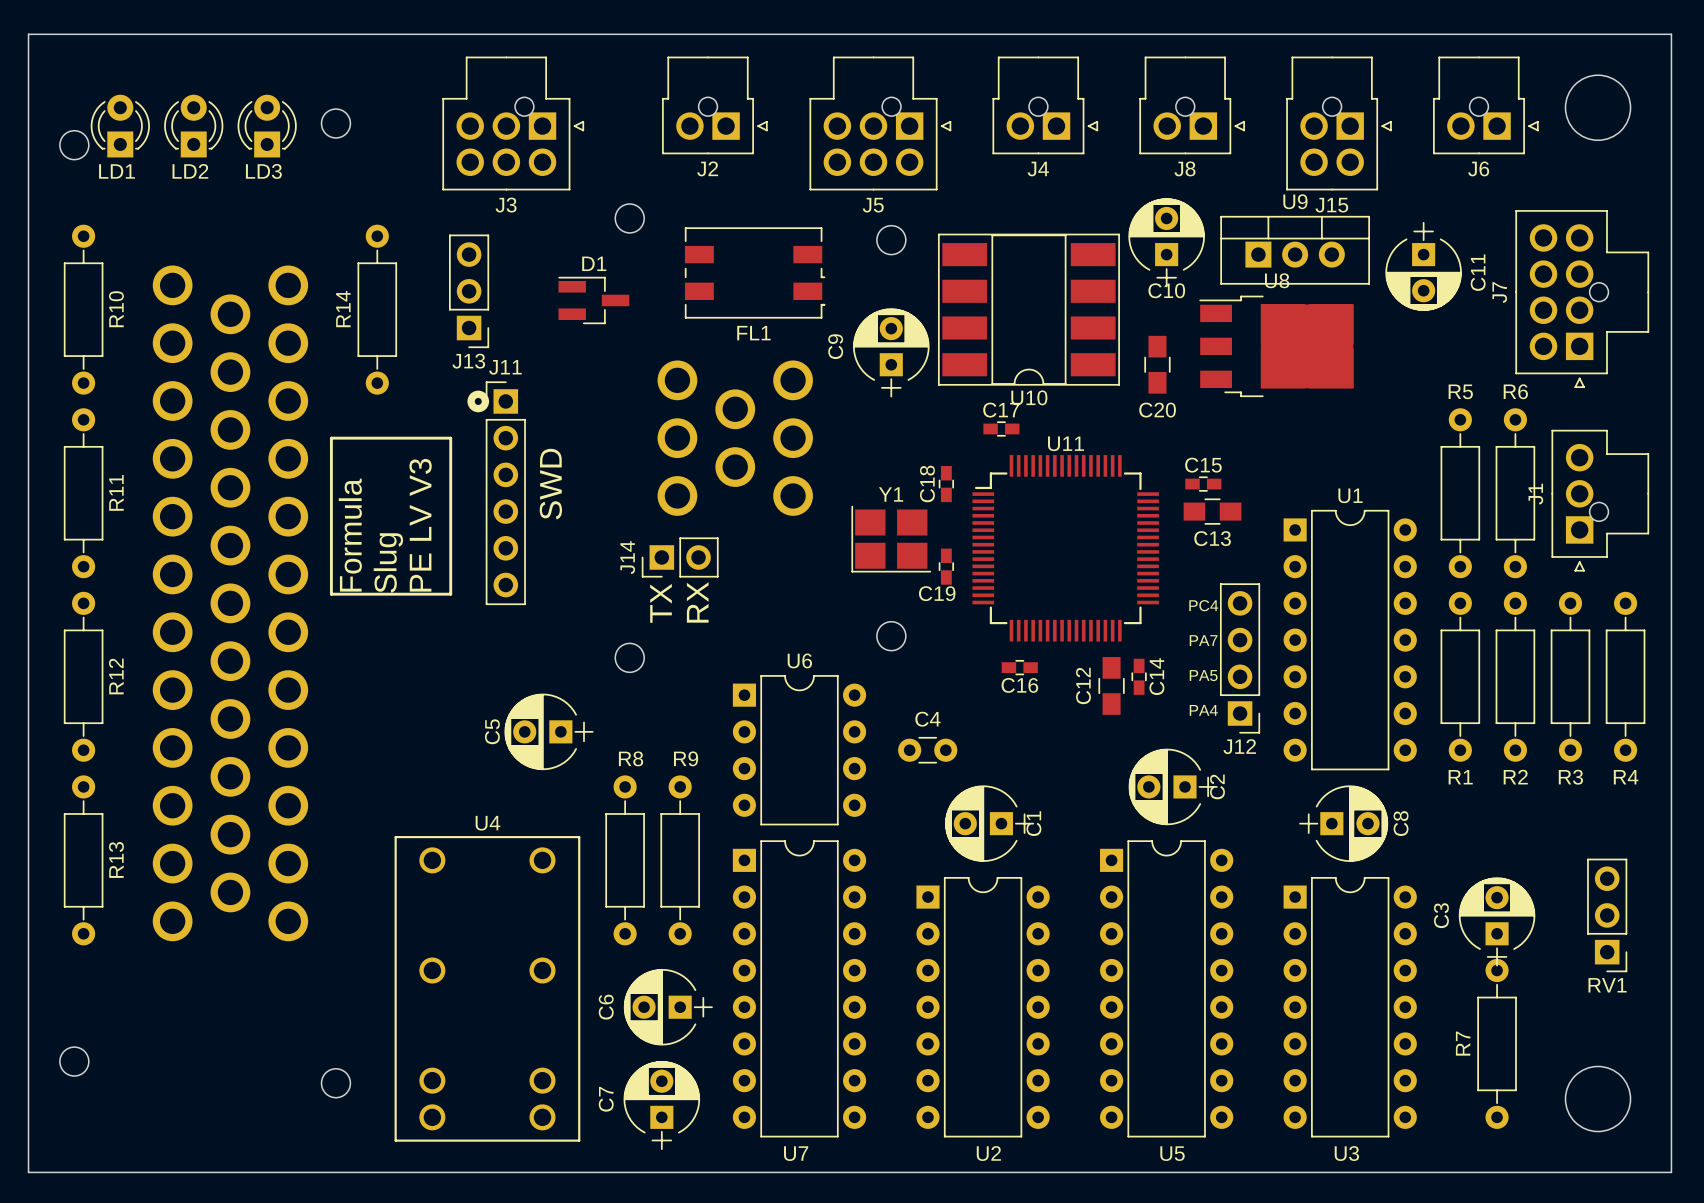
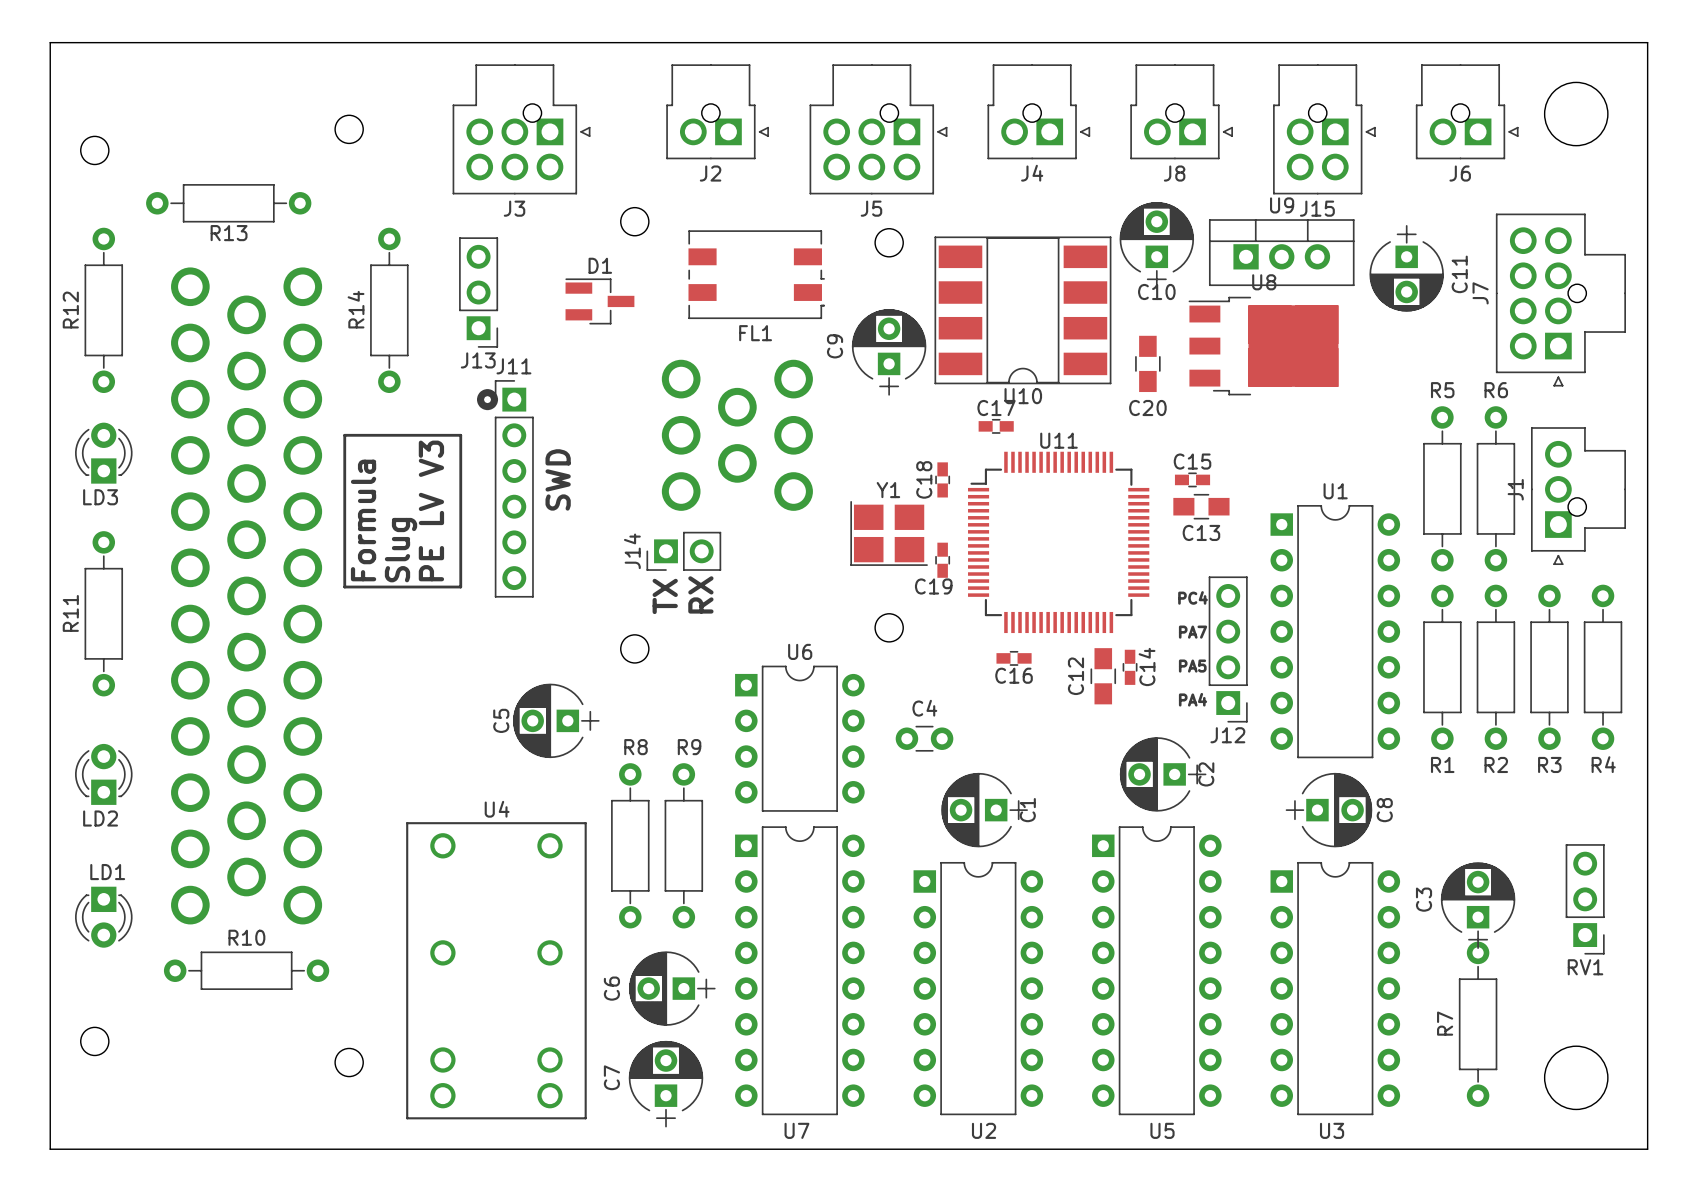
LD1 rotation: 0° (120, 126) -> 180° (103, 917)
LD1 position: (120, 126) -> (103, 917)
LD2 position: (193, 126) -> (103, 774)
LD3 position: (267, 126) -> (103, 453)
R10 name: R10 (116, 309) -> R12 (70, 310)
R11 name position: R11 (116, 492) -> R11 (70, 613)
R11 position: (83, 493) -> (103, 613)
R12: (83, 676) -> none
R13 rotation: 0° (83, 860) -> 90° clockwise (228, 203)
R13 position: (83, 860) -> (228, 203)
R10: none -> (246, 970)

